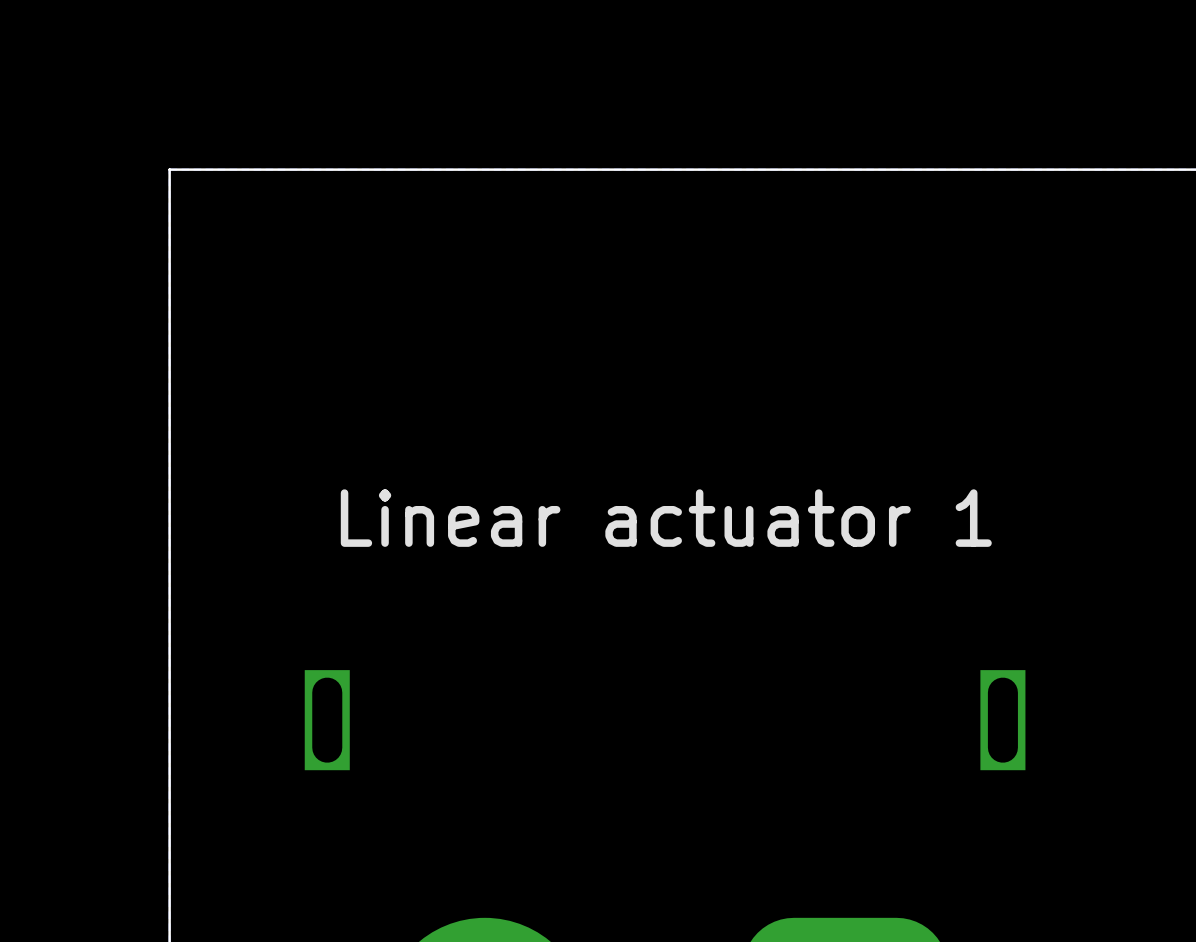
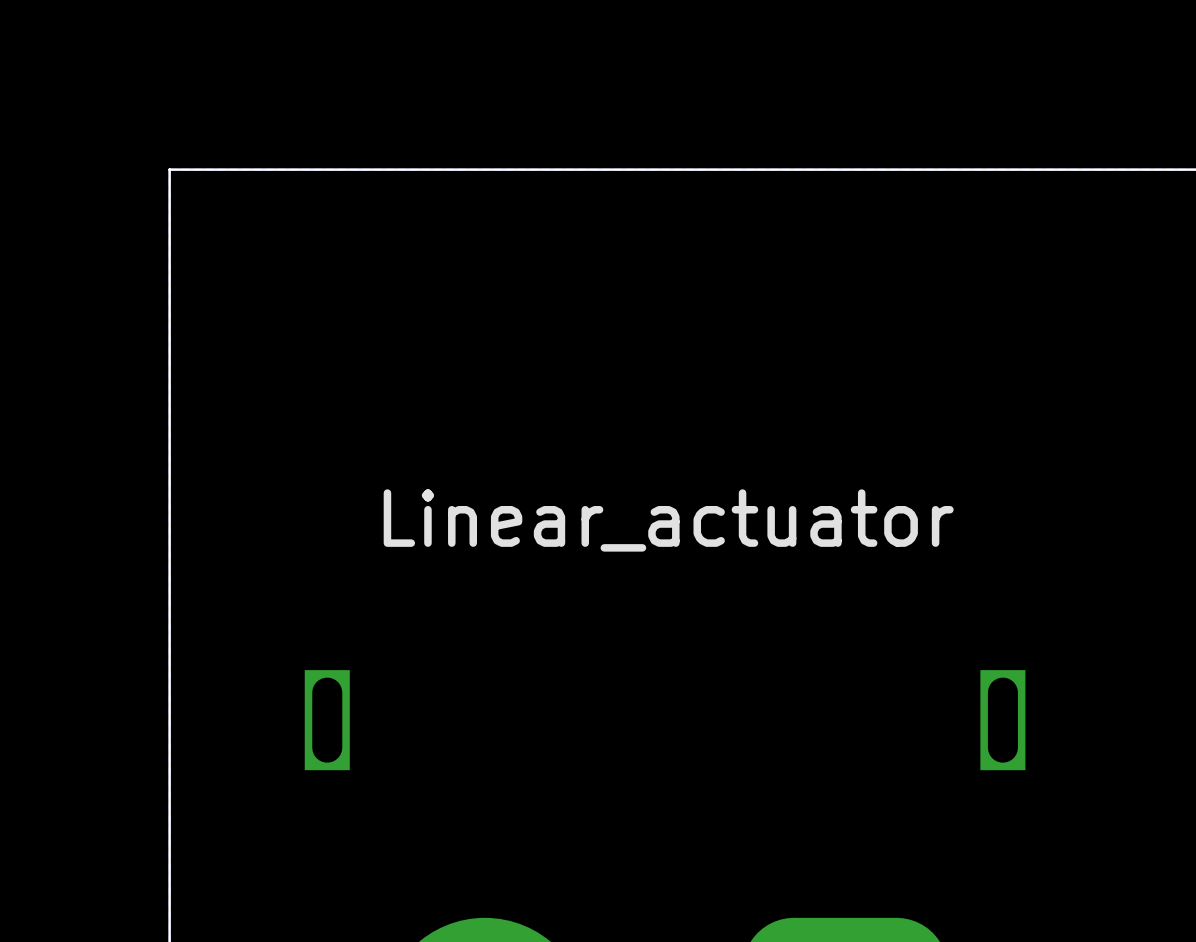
part value: Linear actuator 1 (666, 518) -> Linear_actuator (668, 520)

